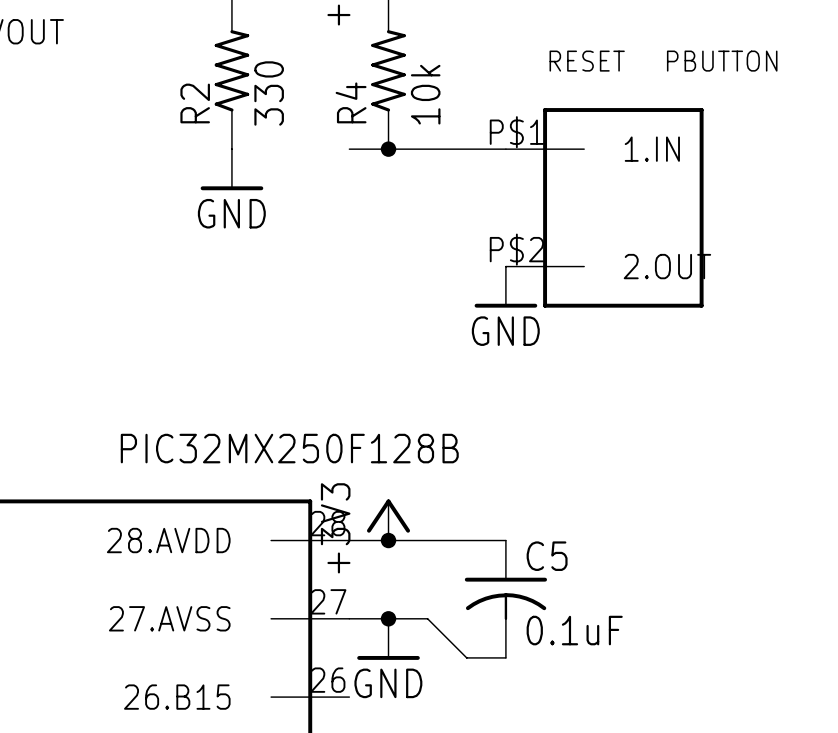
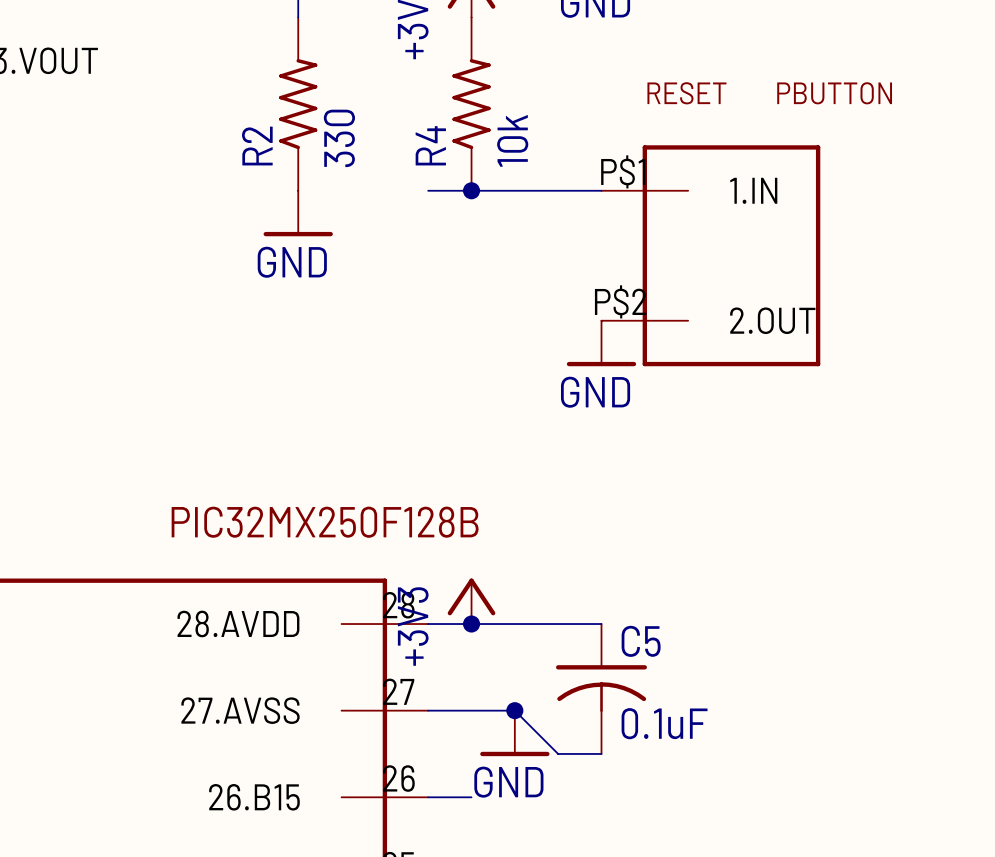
junction position: (388, 618) -> (514, 710)
power symbol position: GND (388, 639) -> GND (514, 733)
wire: none -> (428, 797) (471, 797)

